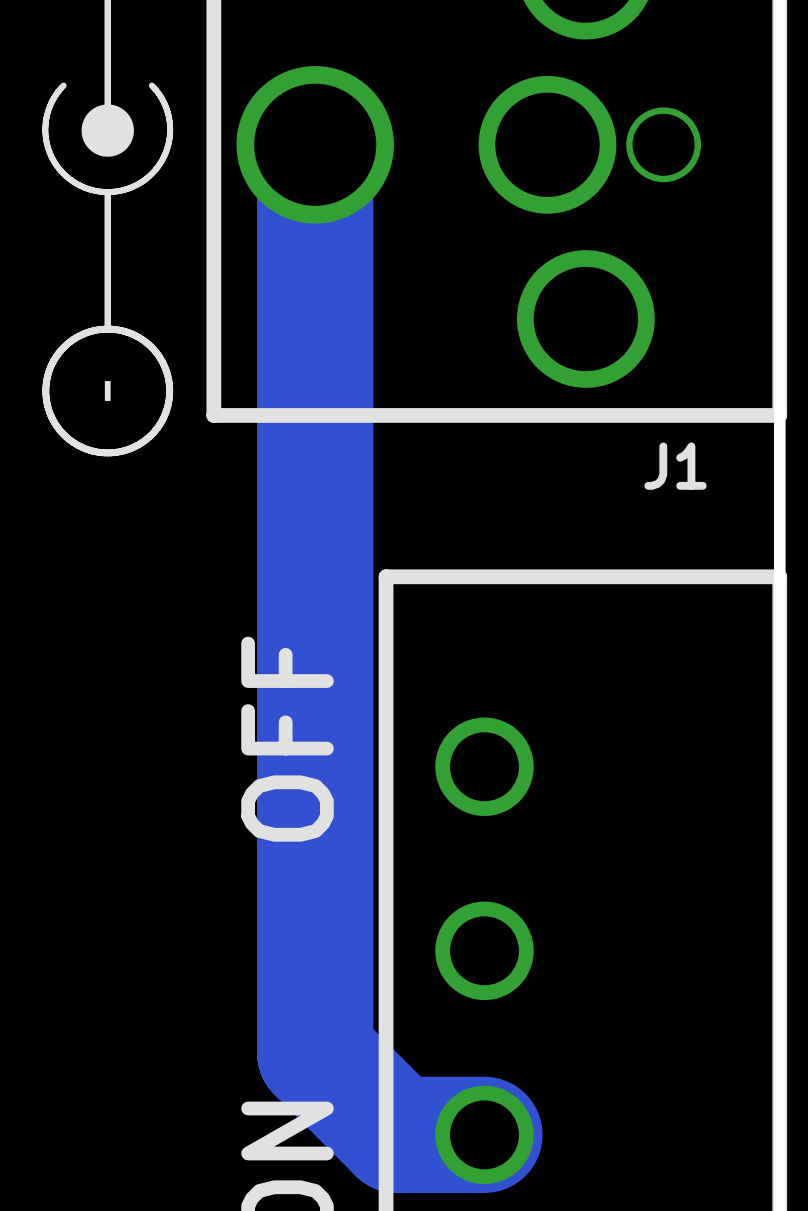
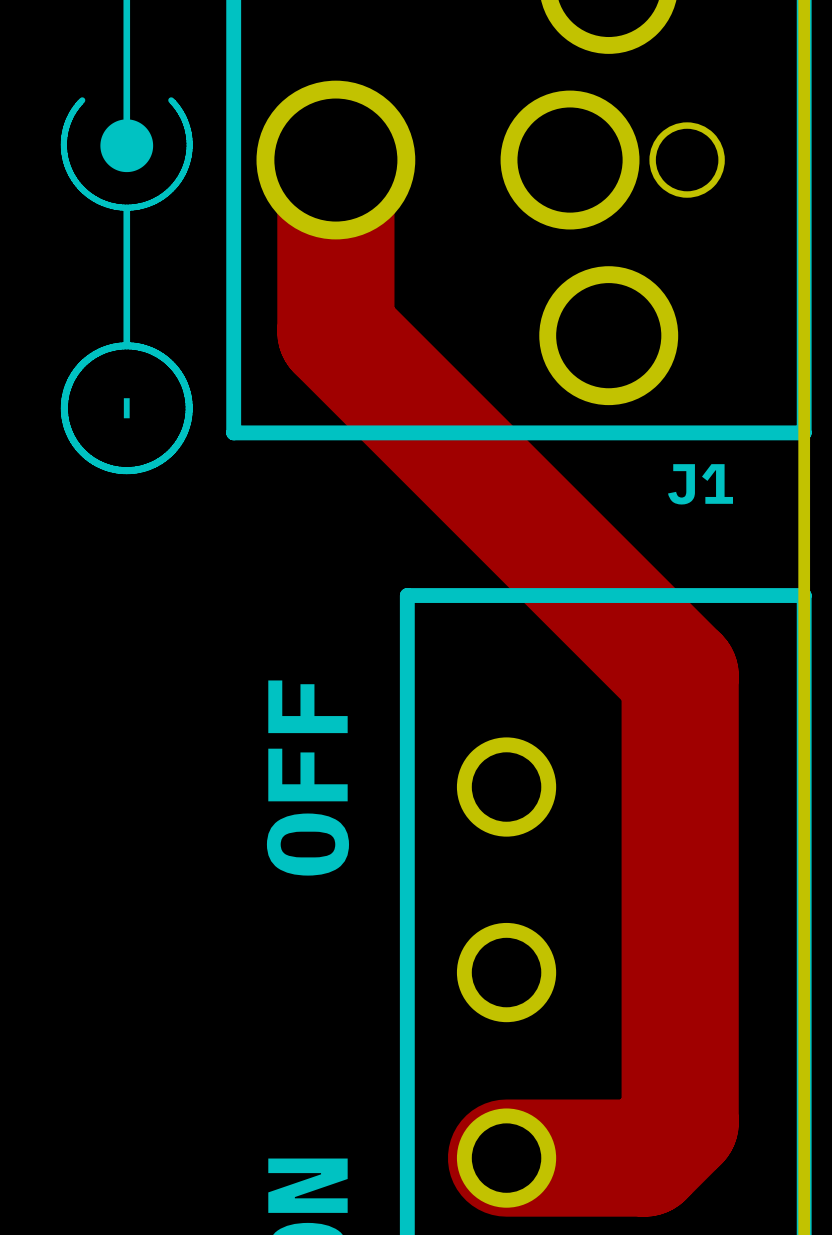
bottom track: (315, 144) (315, 1053) (396, 1134) (484, 1134) -> none
top track: none -> (335, 160) (335, 331) (680, 675) (680, 1122) (644, 1158) (506, 1158)

